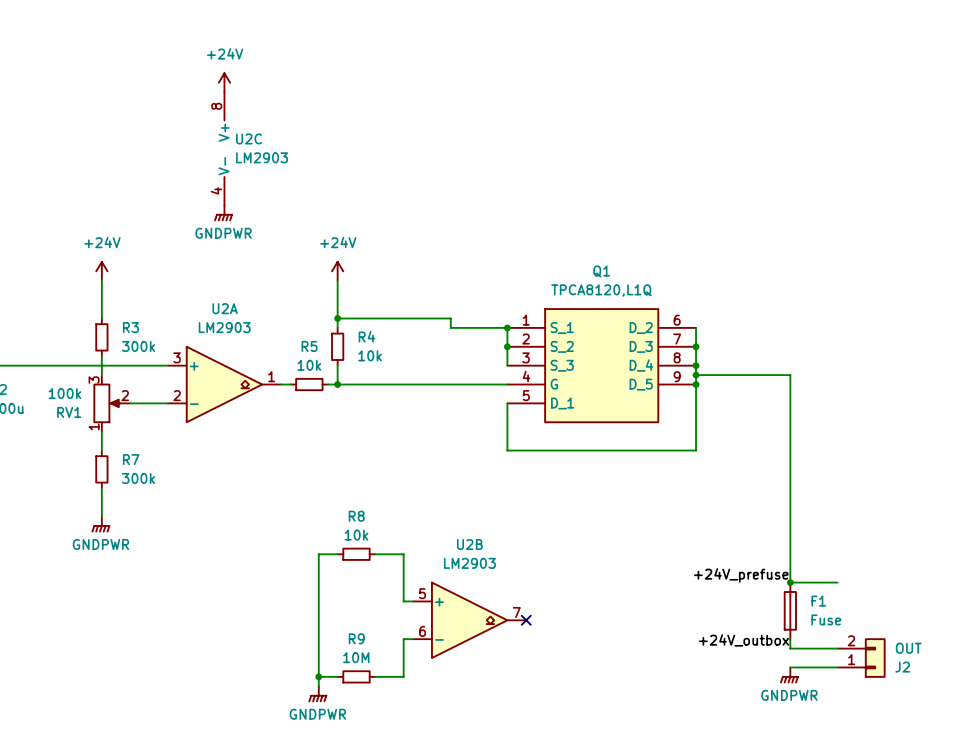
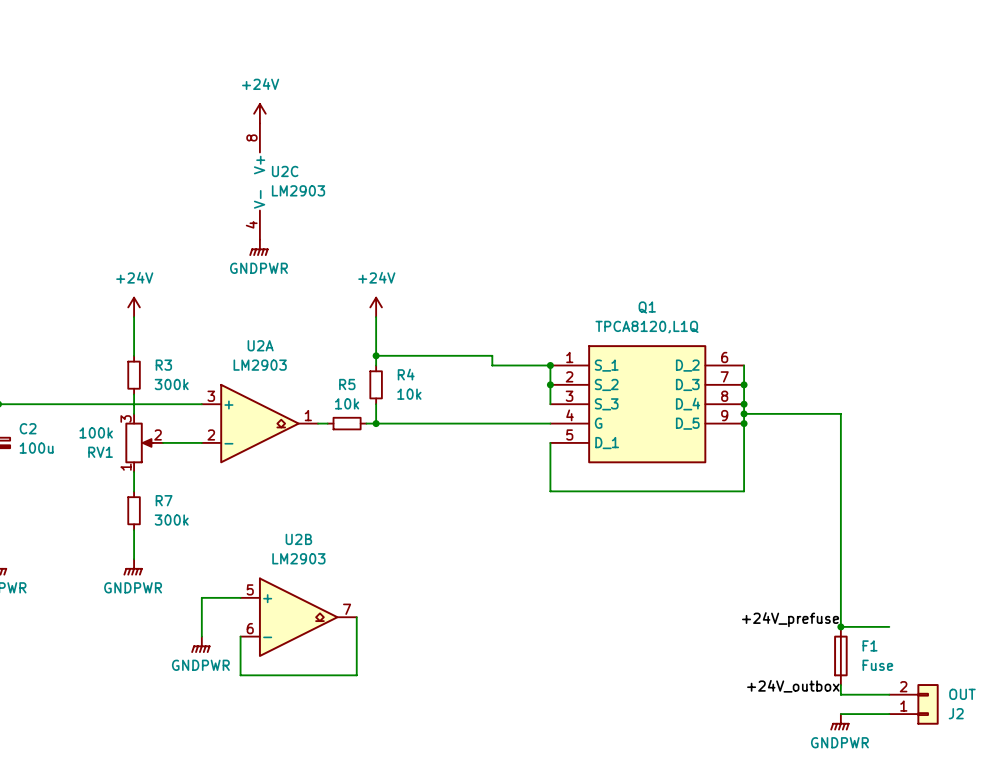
wire: none -> (240, 597) (201, 597) (201, 636)
wire: (337, 554) (318, 554) (318, 573) -> none
R8: 10k (356, 554) -> none
wire: (375, 554) (403, 554) (403, 601) (413, 601) -> none
U2B position: (469, 620) -> (298, 617)
no-connect mark: (526, 620) -> none
wire: (318, 629) (318, 686) -> (356, 675) (240, 675) (240, 636)
wire: (413, 639) (403, 639) (403, 676) (375, 676) -> none
wire: (318, 676) (337, 676) -> none
junction: (318, 676) -> none
R9: 10M (356, 676) -> none
power symbol position: GNDPWR (317, 694) -> GNDPWR (200, 644)

